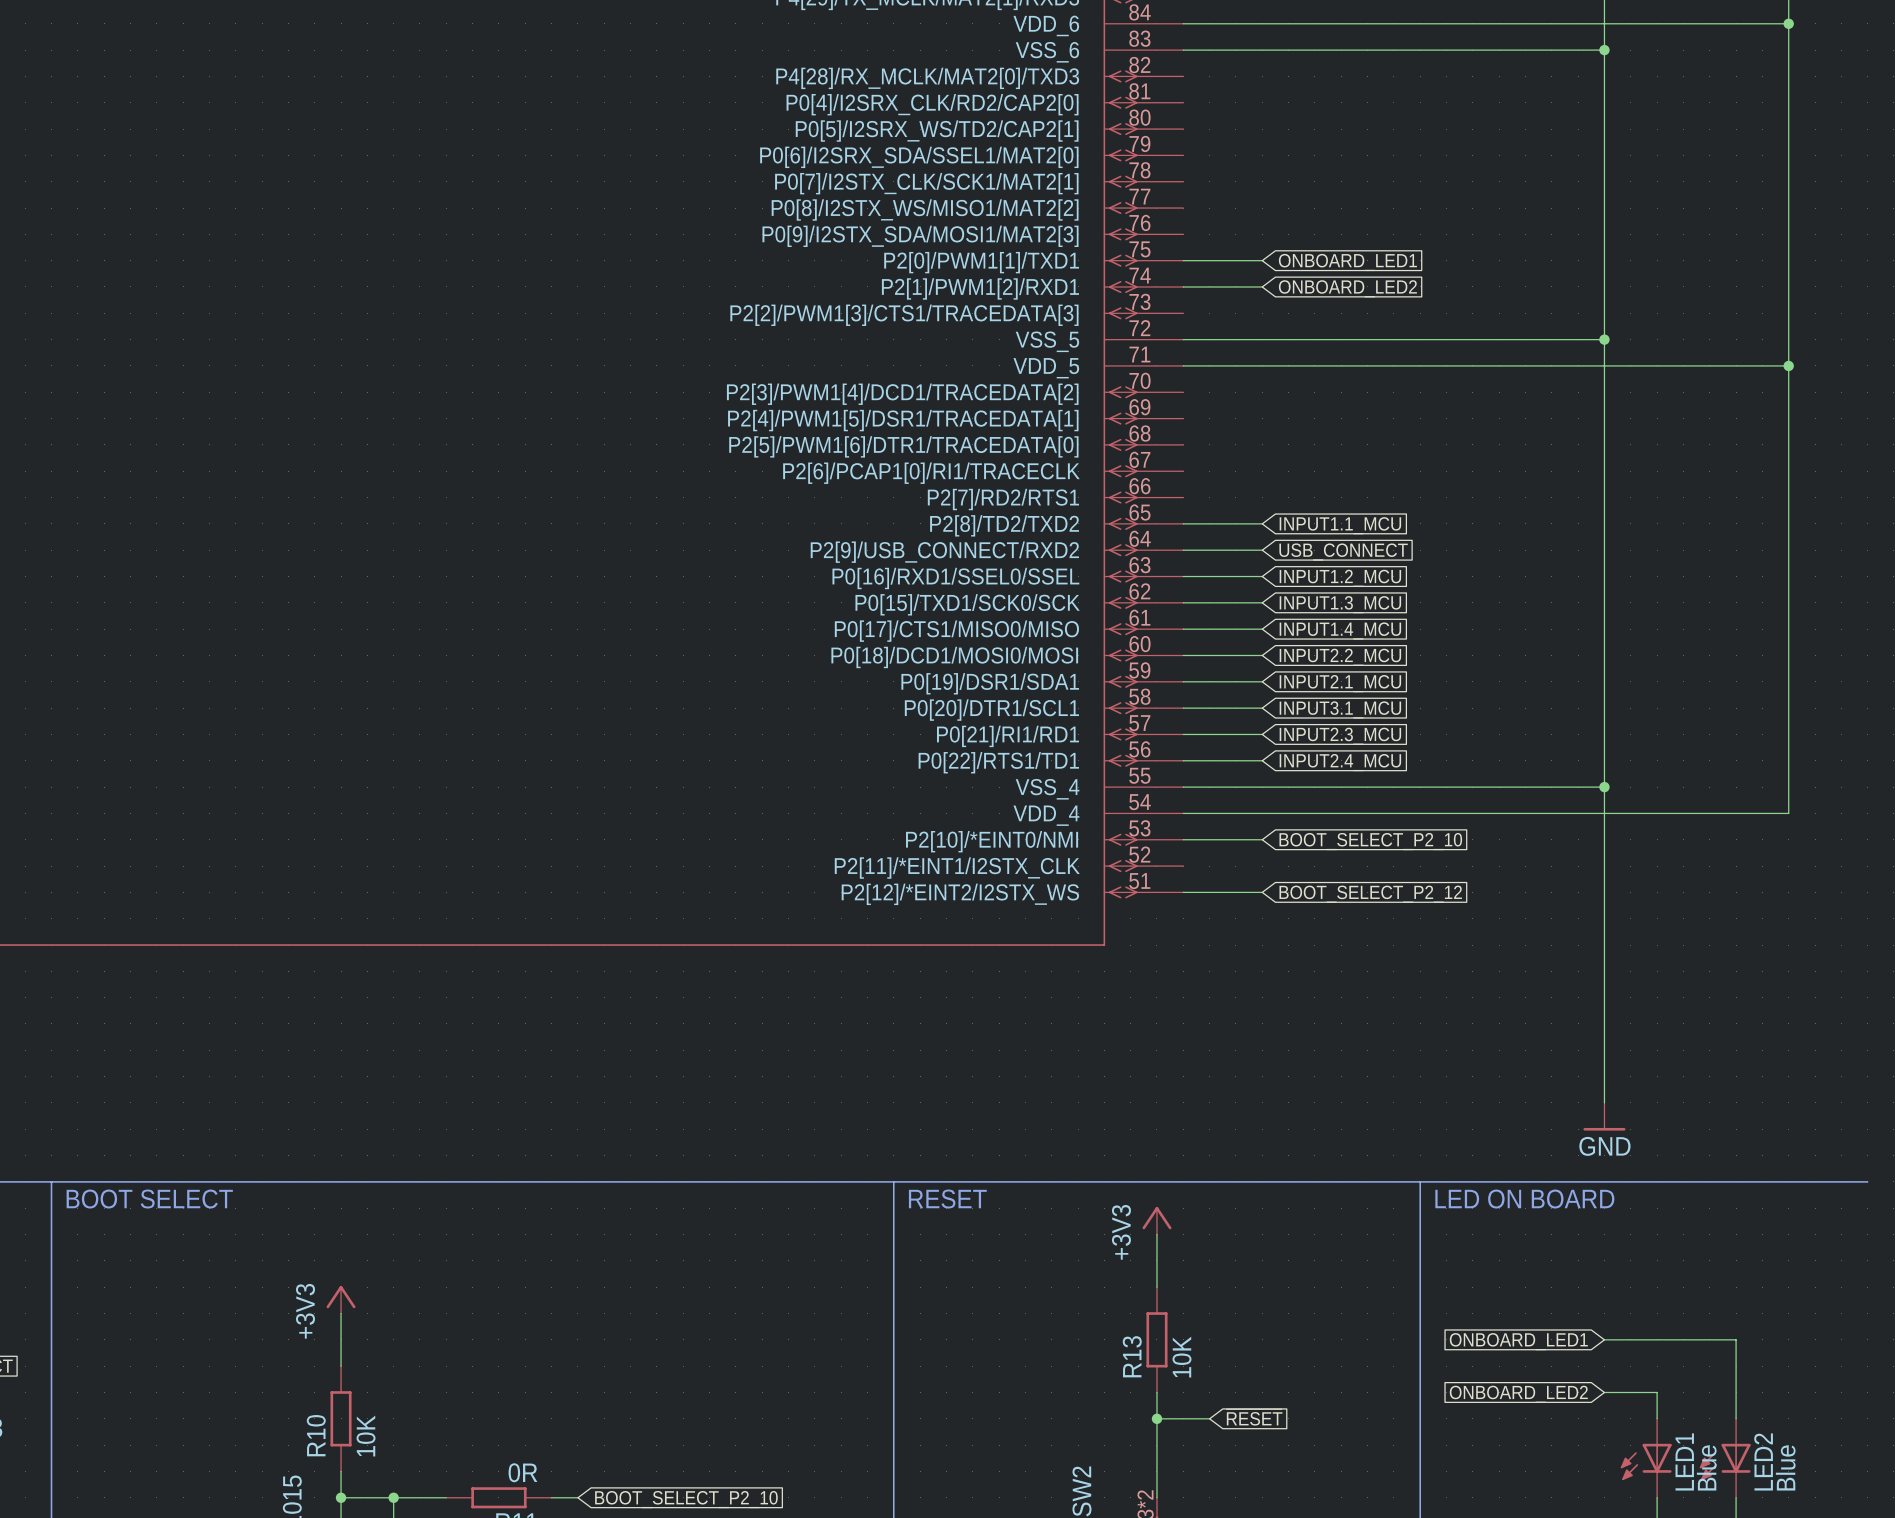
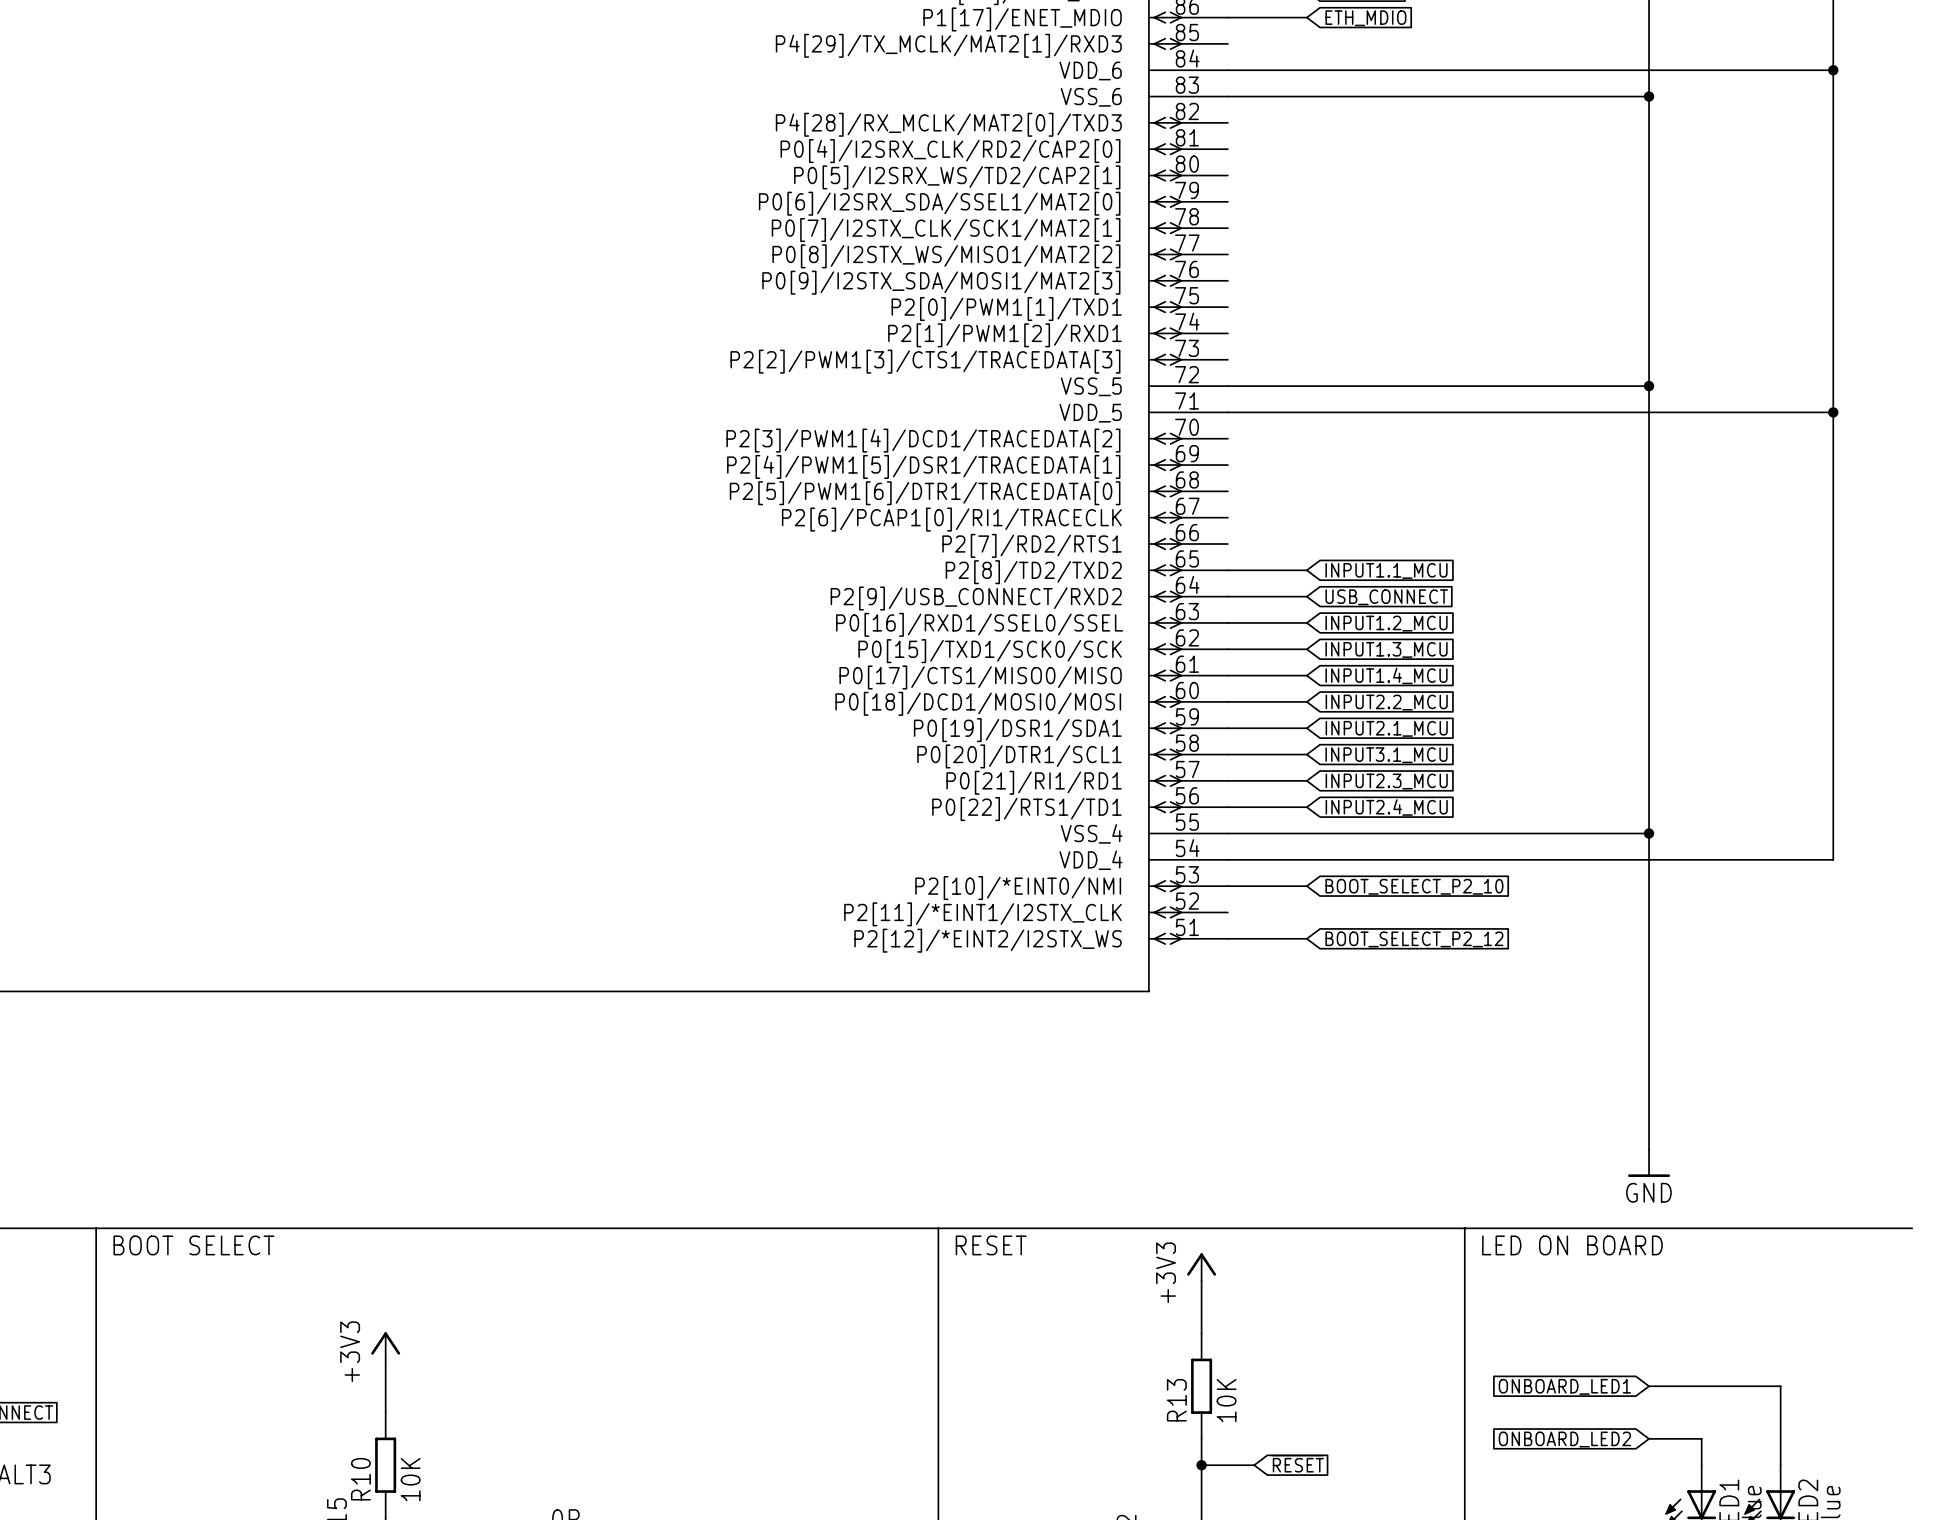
wire: (1183, 260) (1262, 260) -> none
global label: ONBOARD_LED1 (1347, 262) -> none
wire: (1183, 286) (1262, 286) -> none
global label: ONBOARD_LED2 (1347, 288) -> none

